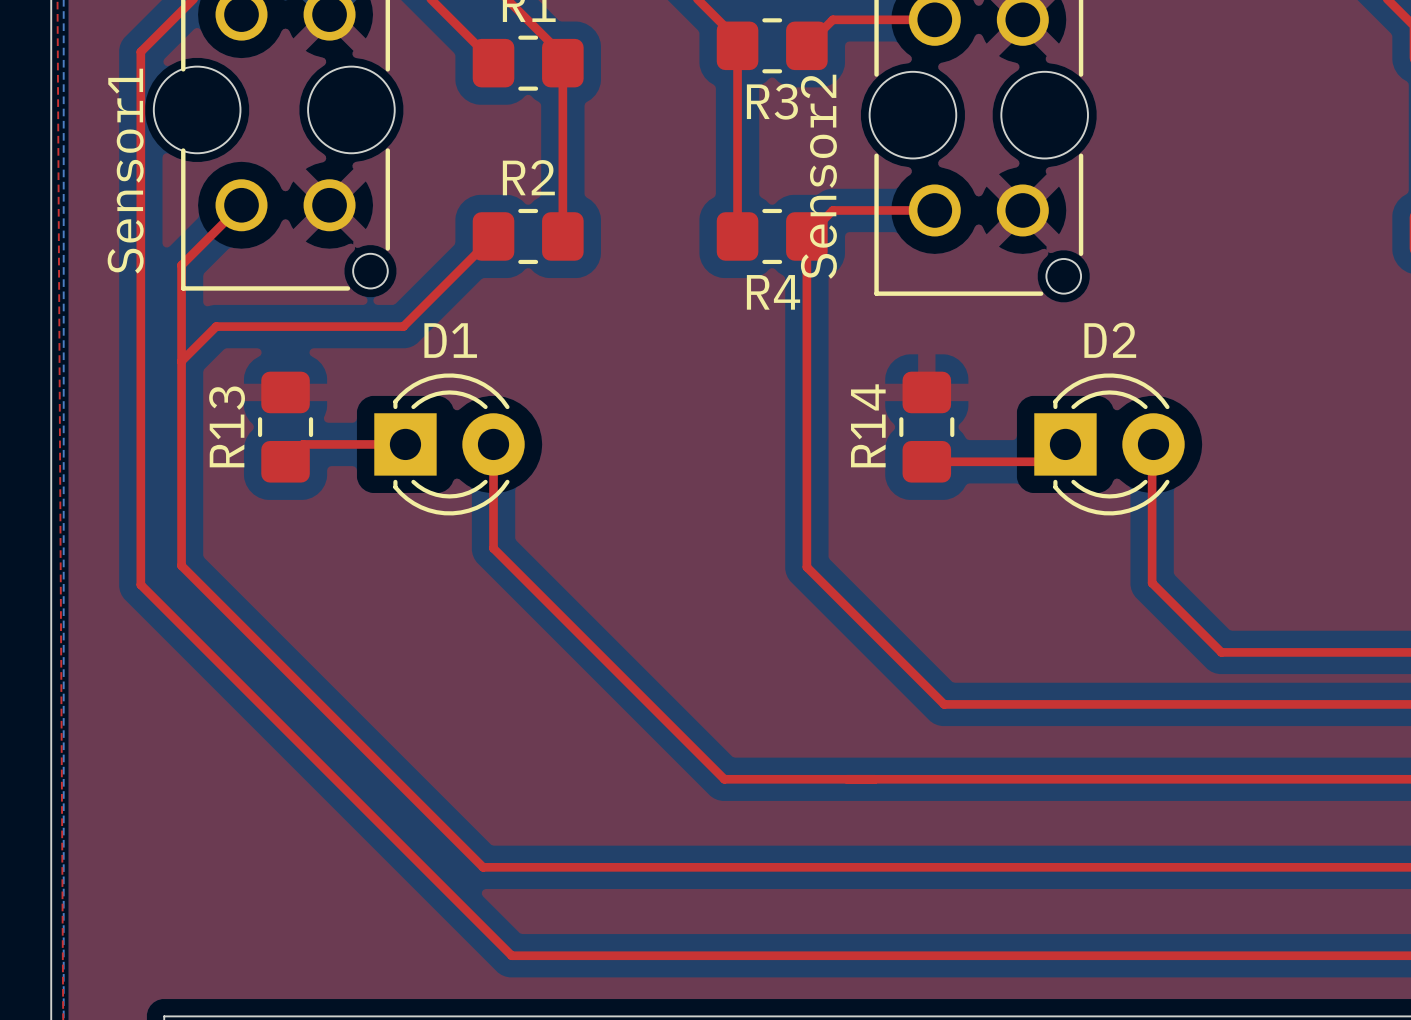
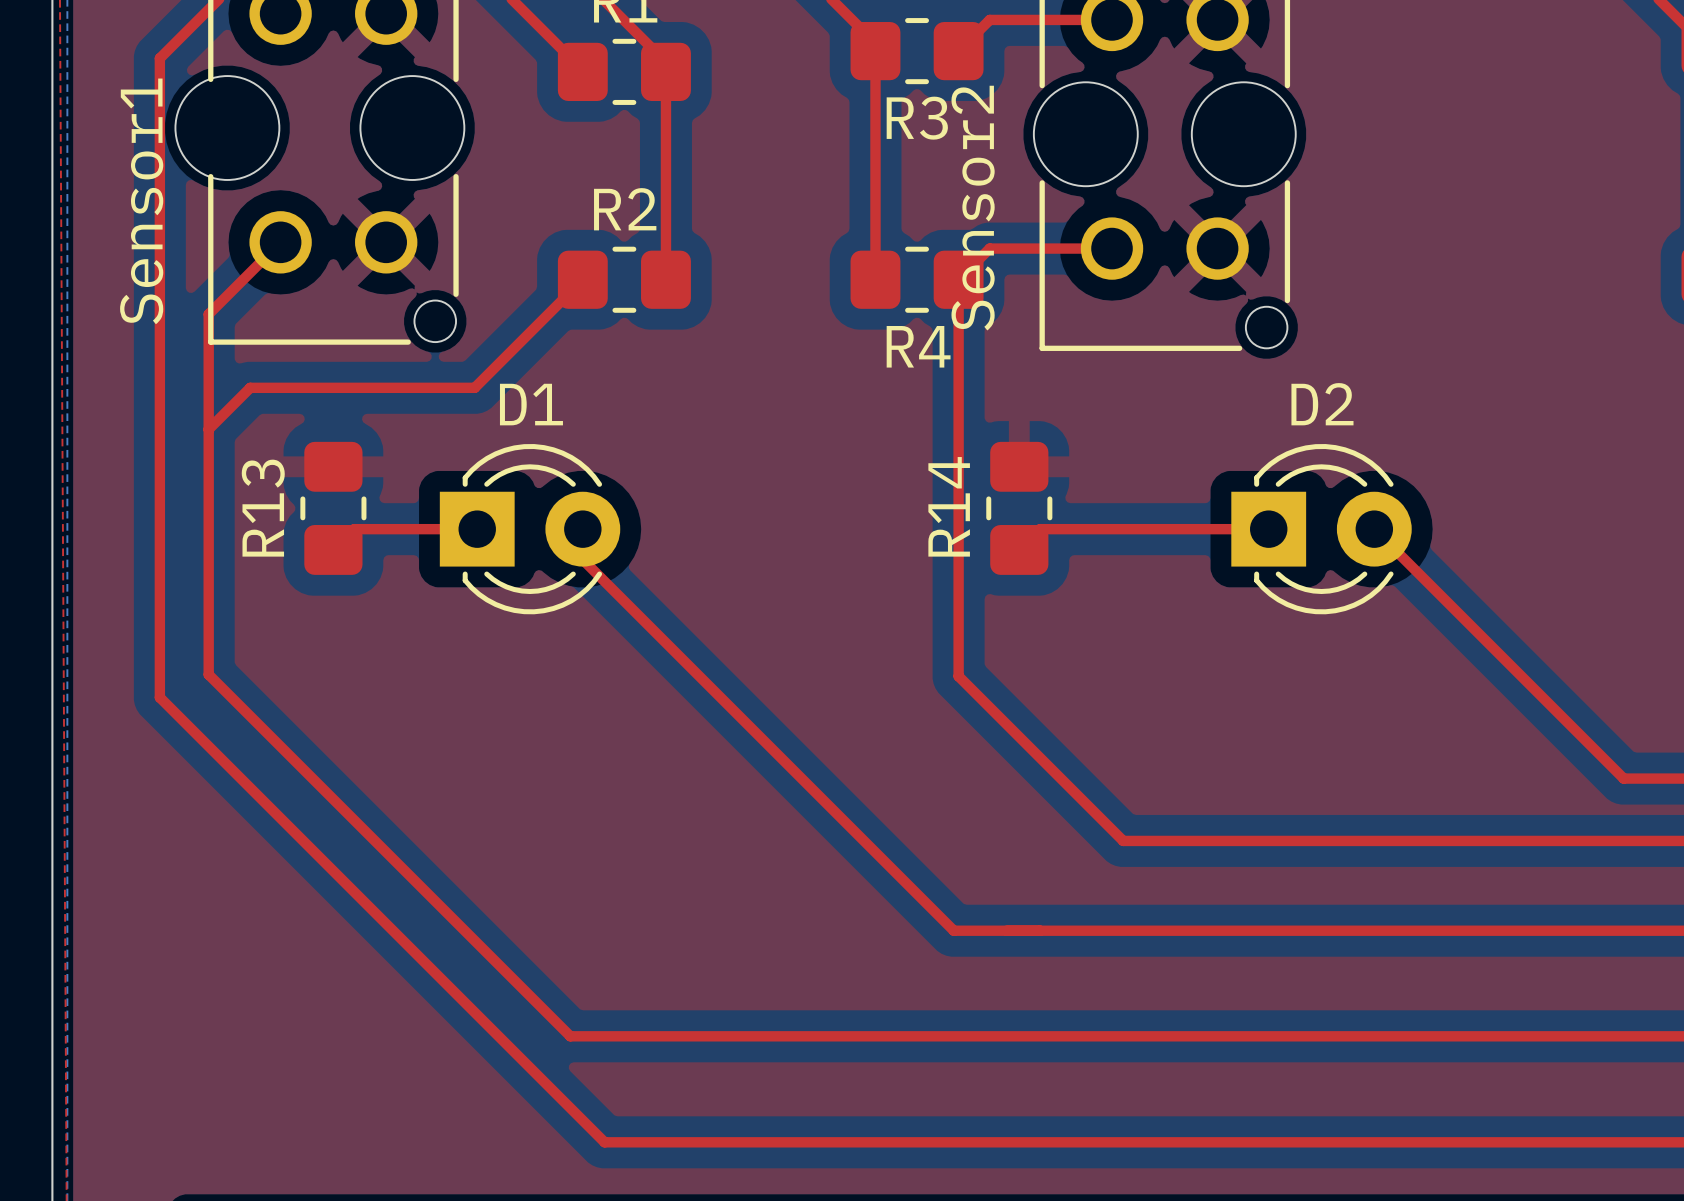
R14 position: (926, 427) -> (1019, 508)
top track: none -> (1268, 529) (1040, 529) (1019, 549)
top track: (1153, 444) (1152, 583) (1221, 652) (1361, 652) -> (1374, 529) (1623, 778)
top track: (926, 461) (1048, 461) -> none
top track: (493, 469) (493, 548) (724, 779) (802, 779) -> (582, 559) (953, 930)

